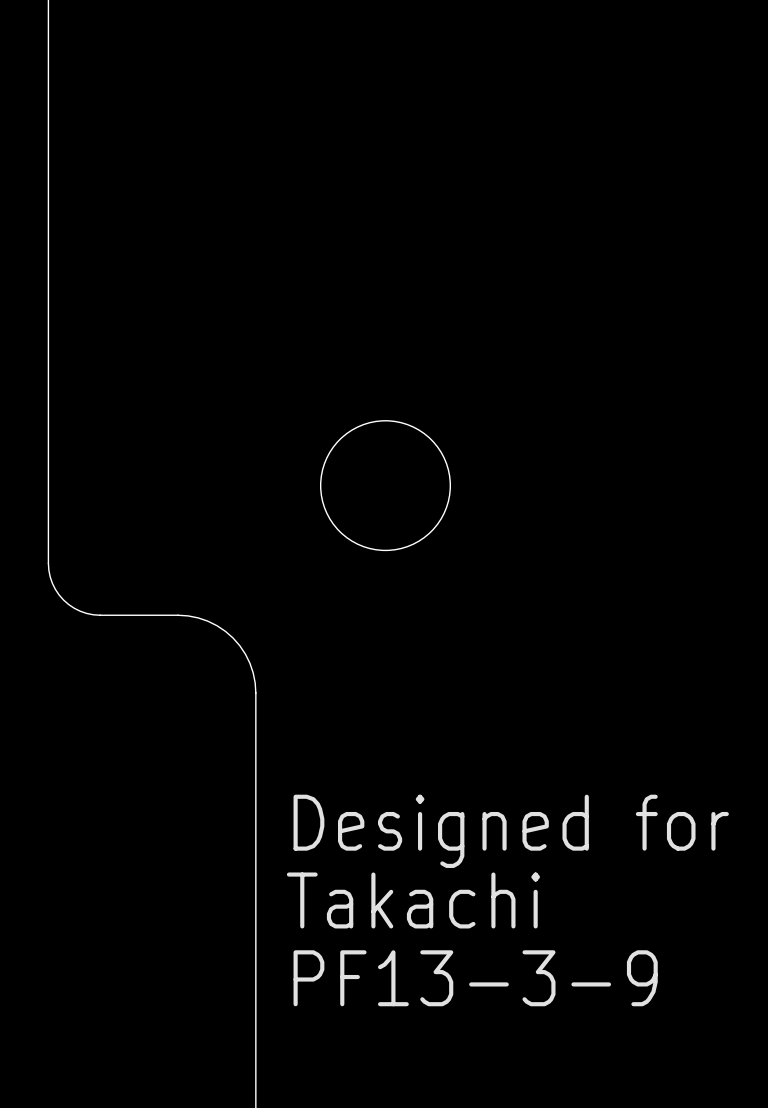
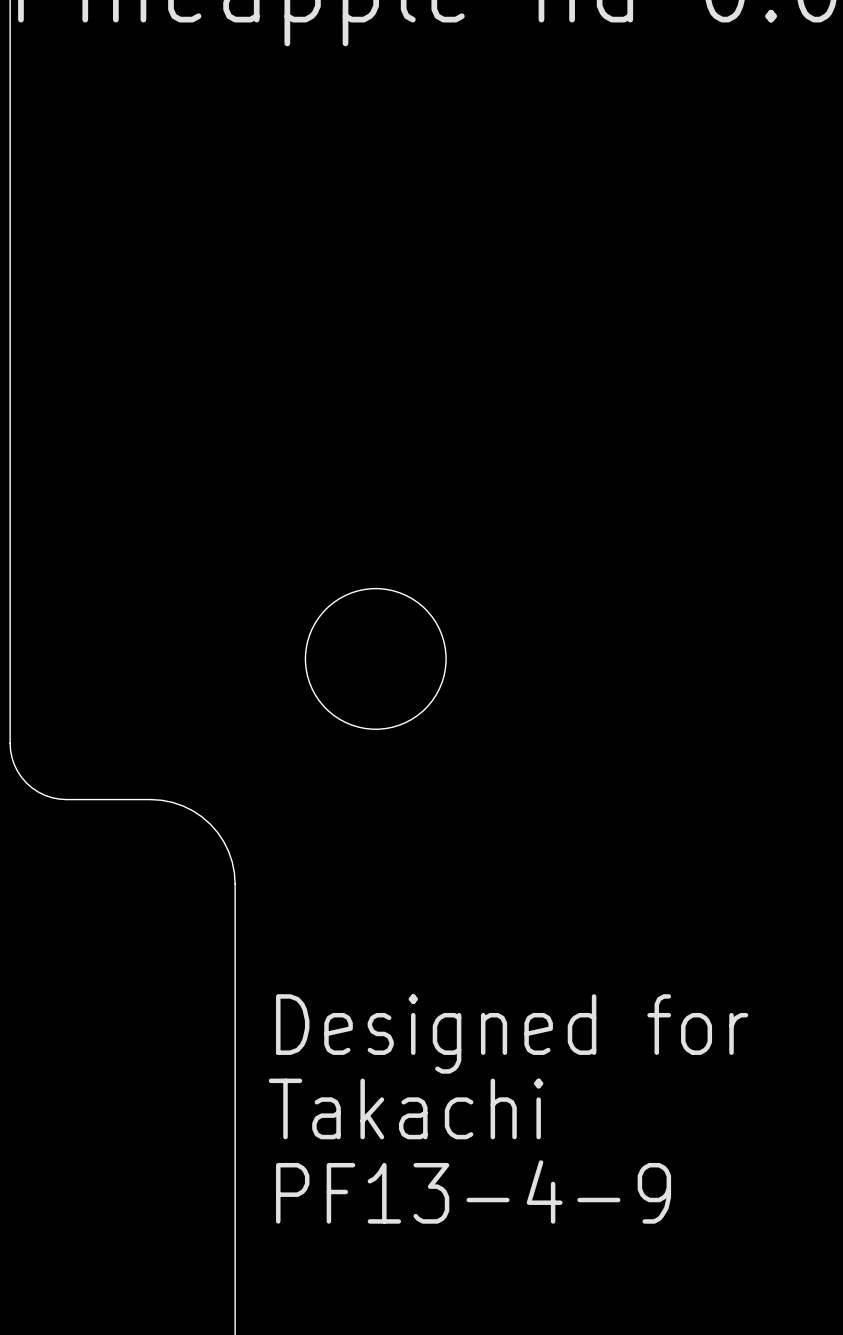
text: PF13-3-9 (475, 978) -> PF13-4-9 (473, 1191)

